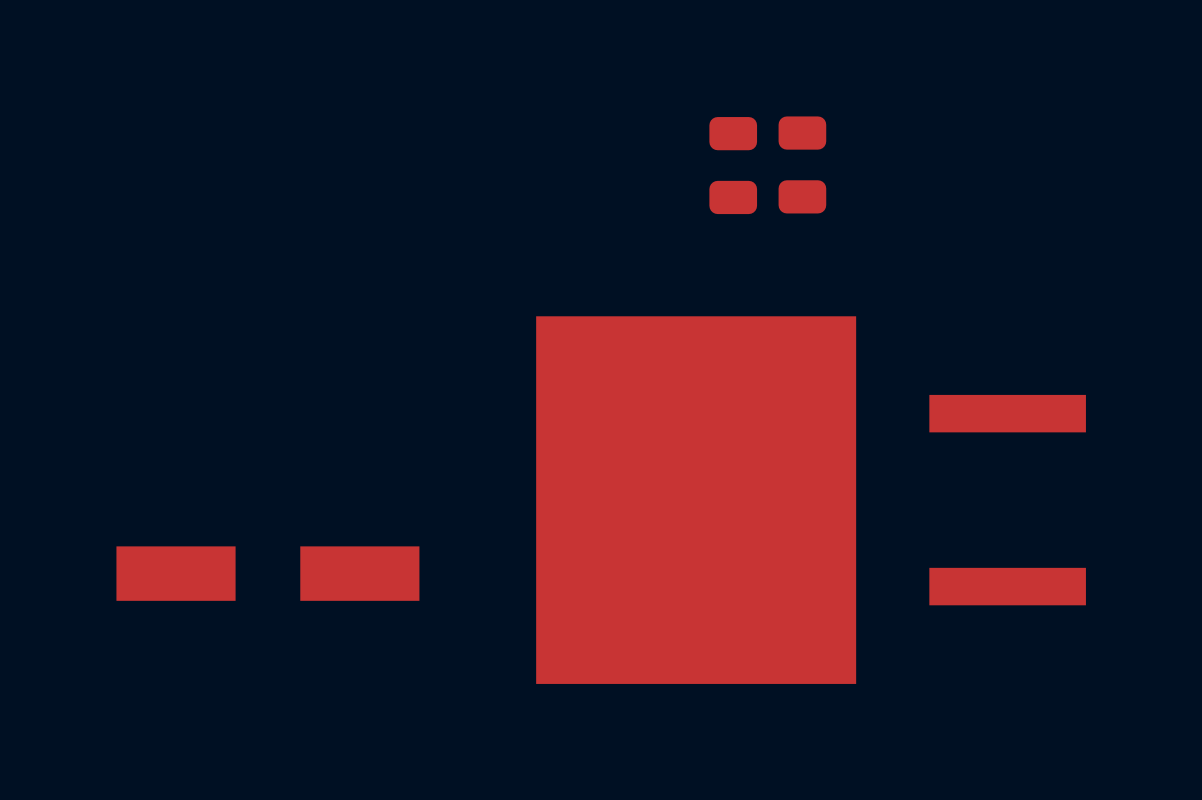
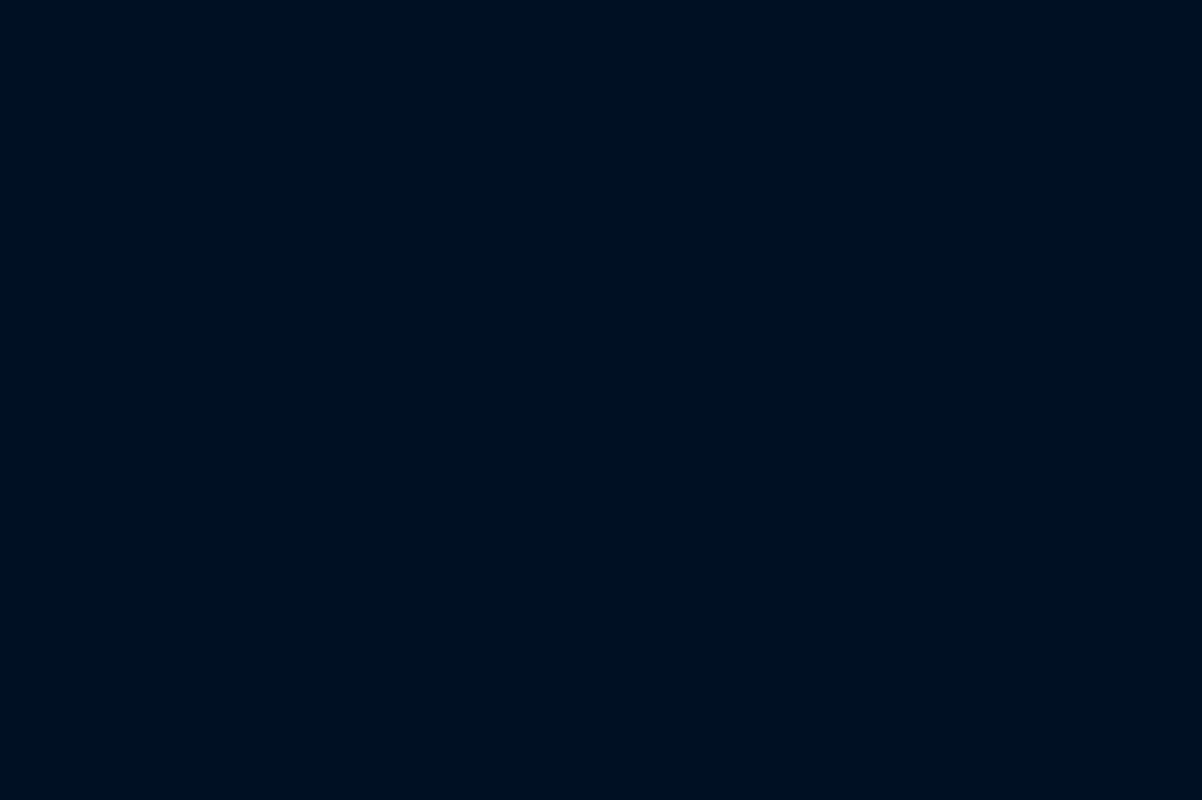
part: (802, 164) -> none
part: (733, 165) -> none
part: (811, 500) -> none
part: (267, 573) -> none

